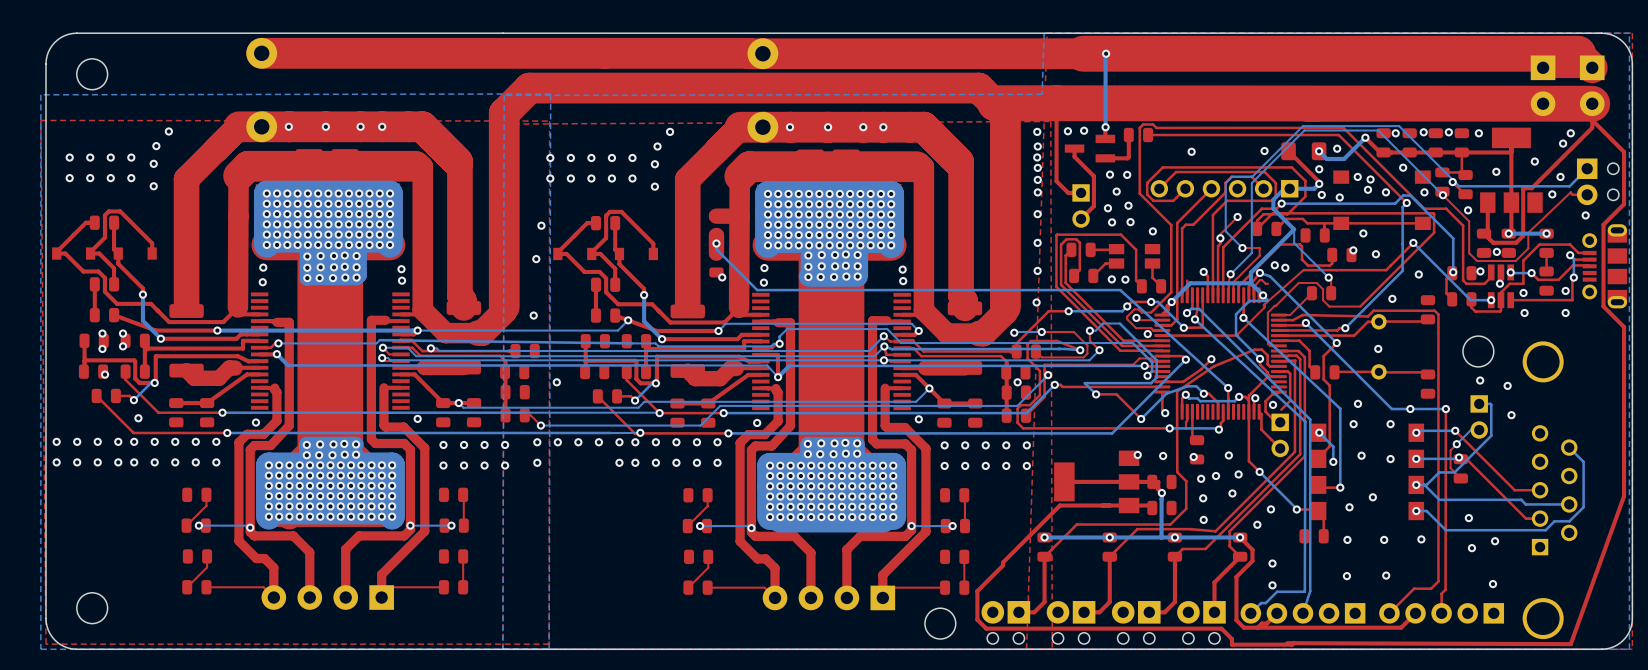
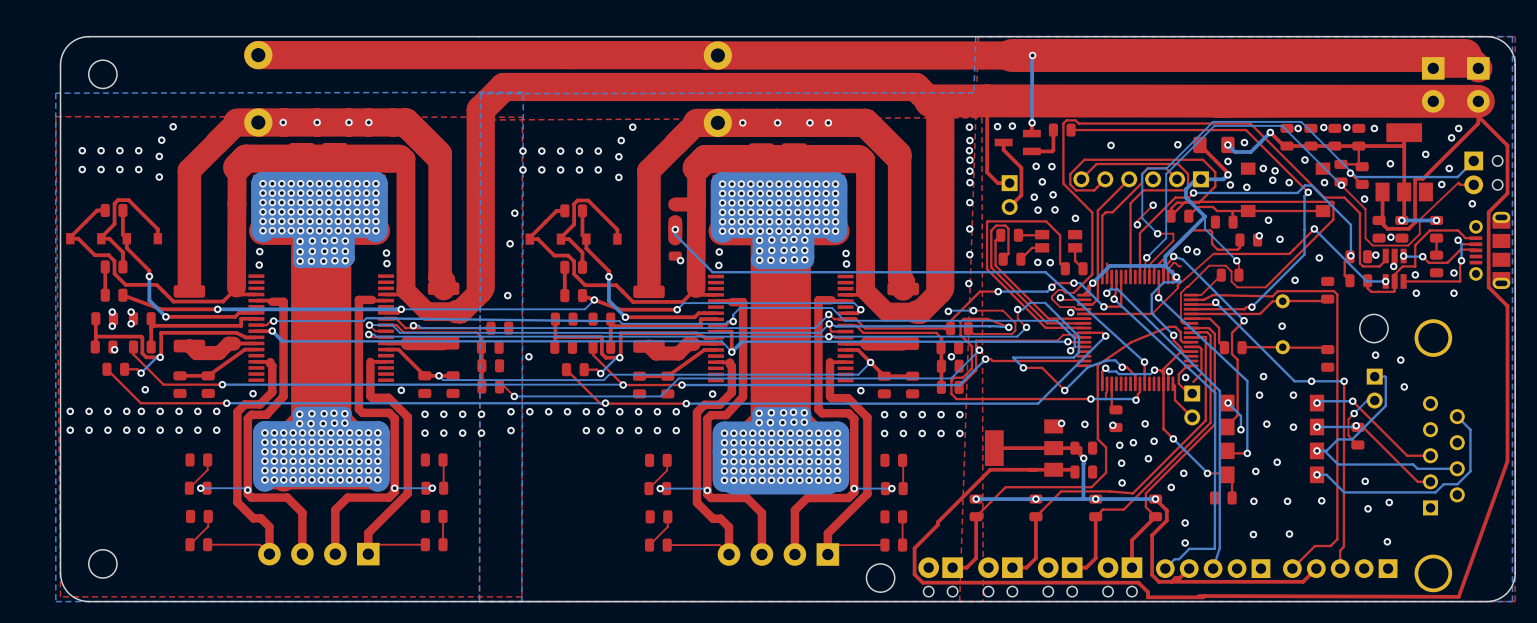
top track: (1220, 238) (1220, 243) (1218, 246) (1218, 295) -> none
top track: (1203, 271) (1207, 276) (1207, 295) -> none
via: (1203, 271) -> none
top track: (1211, 359) (1201, 369) (1183, 381) (1162, 381) -> none
via: (1211, 359) -> none
top track: (1162, 392) (1162, 410) (1165, 413) -> none
via: (1165, 413) -> none

